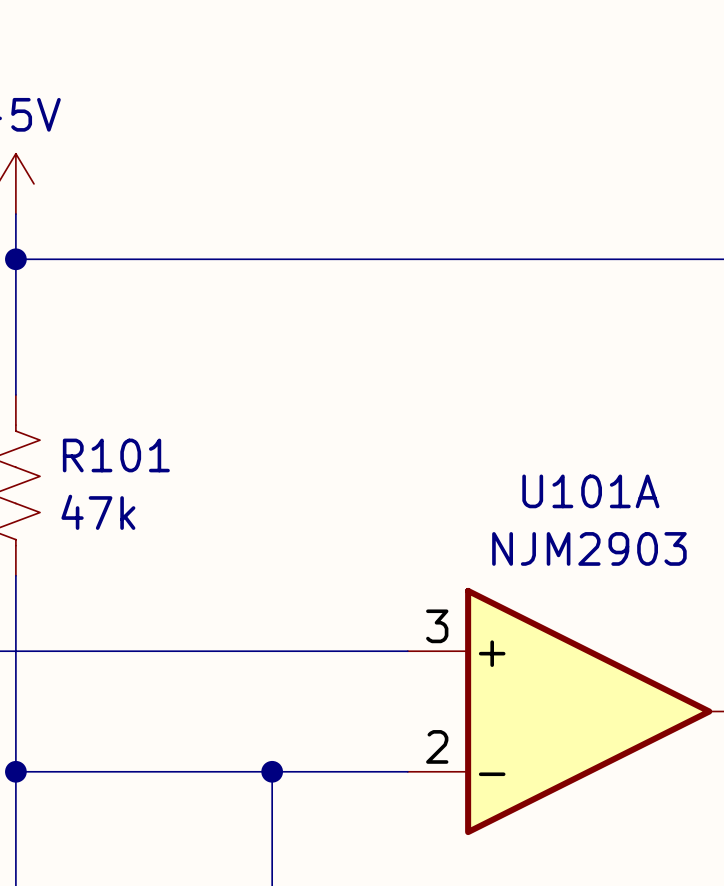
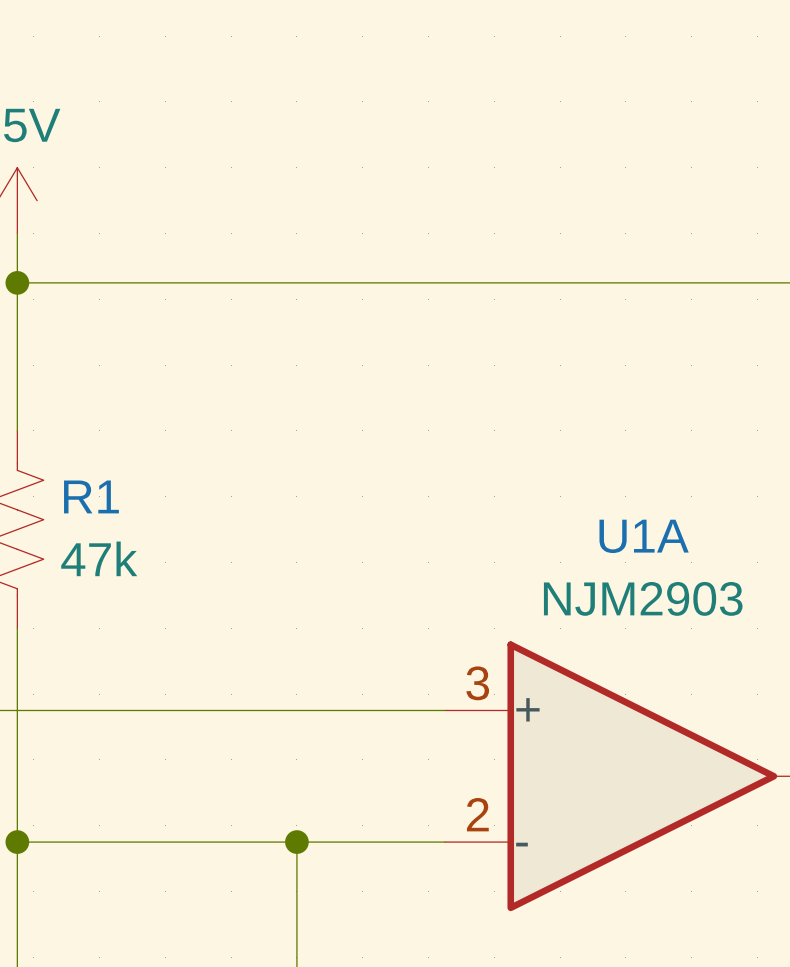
R101 name: R101 (116, 455) -> R1 (91, 496)
U101A name: U101A (590, 491) -> U1A (644, 536)

